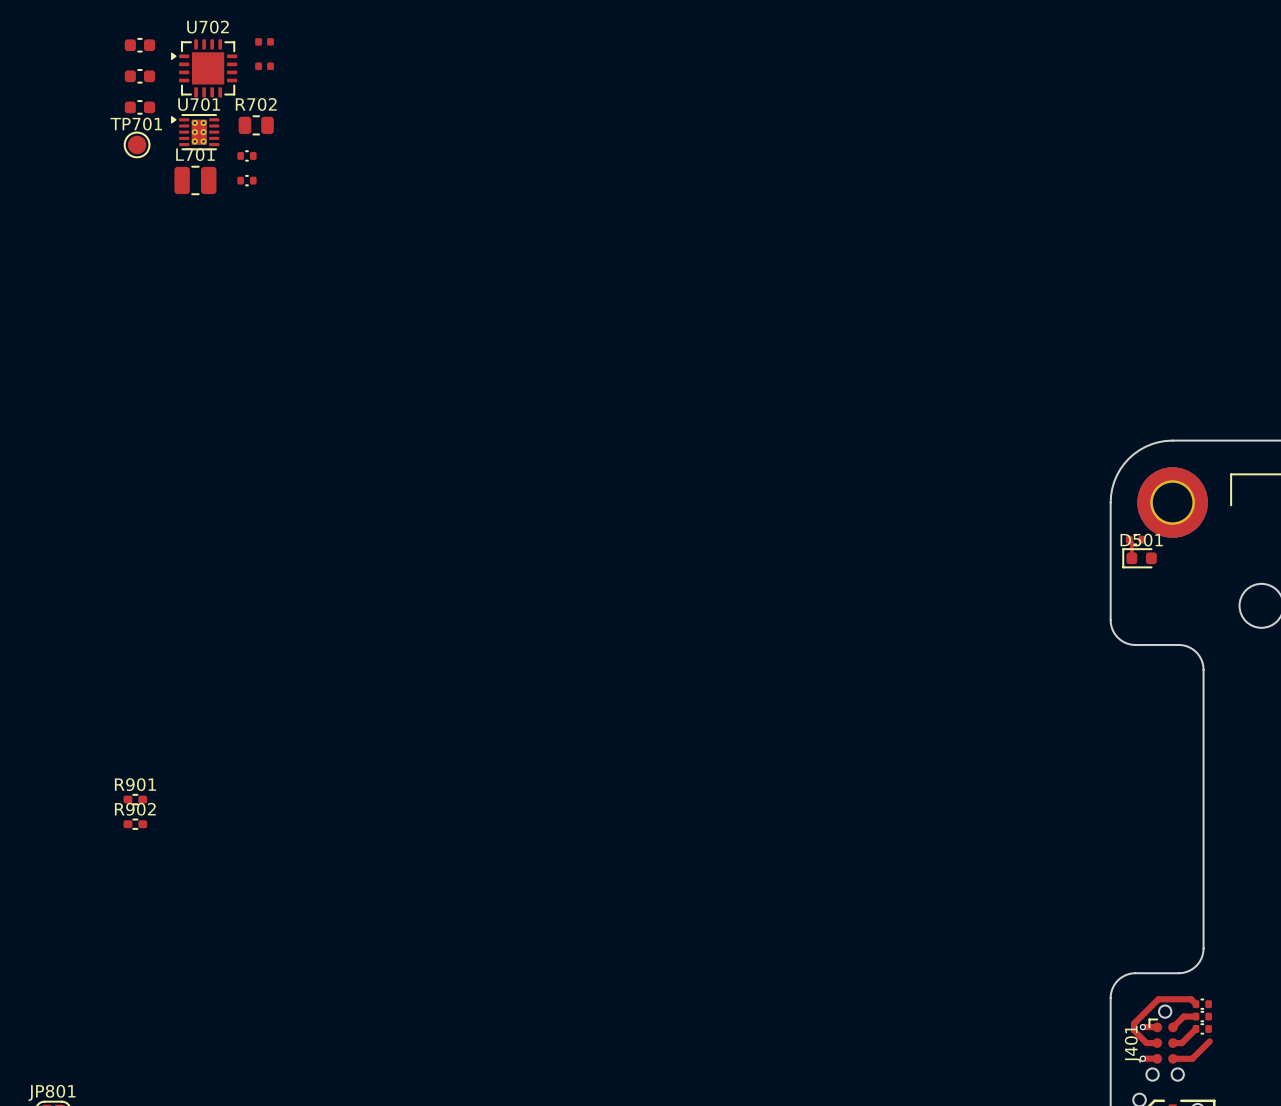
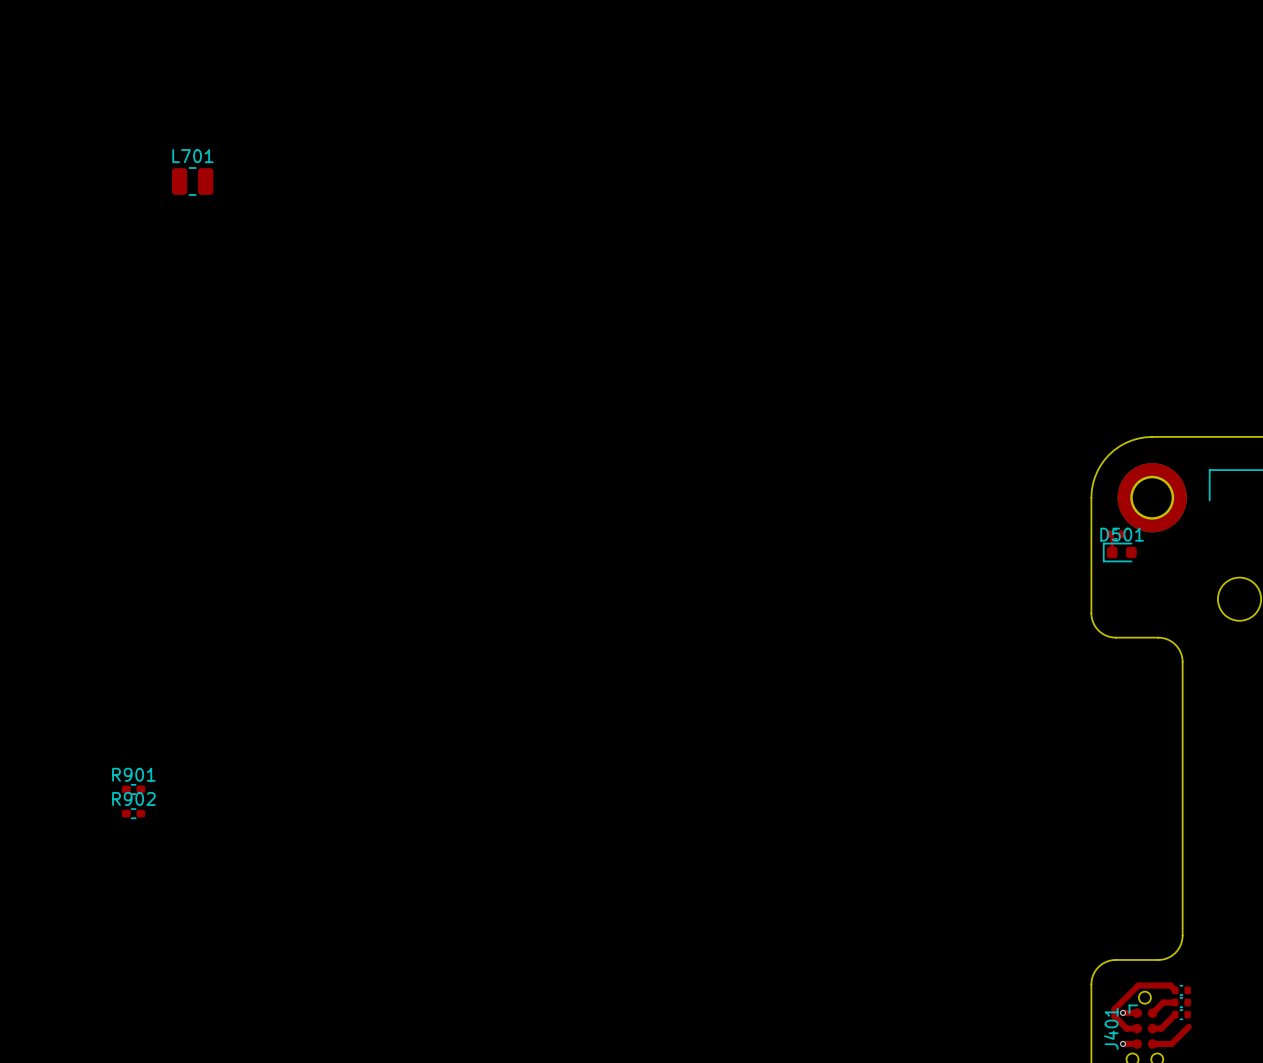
part: (264, 41) -> none
part: (139, 45) -> none
part: (264, 66) -> none
U702: (204, 68) -> none
part: (139, 76) -> none
part: (139, 107) -> none
R702: (256, 125) -> none
U701: (195, 132) -> none
TP701: (137, 144) -> none
part: (246, 155) -> none
part: (246, 180) -> none

